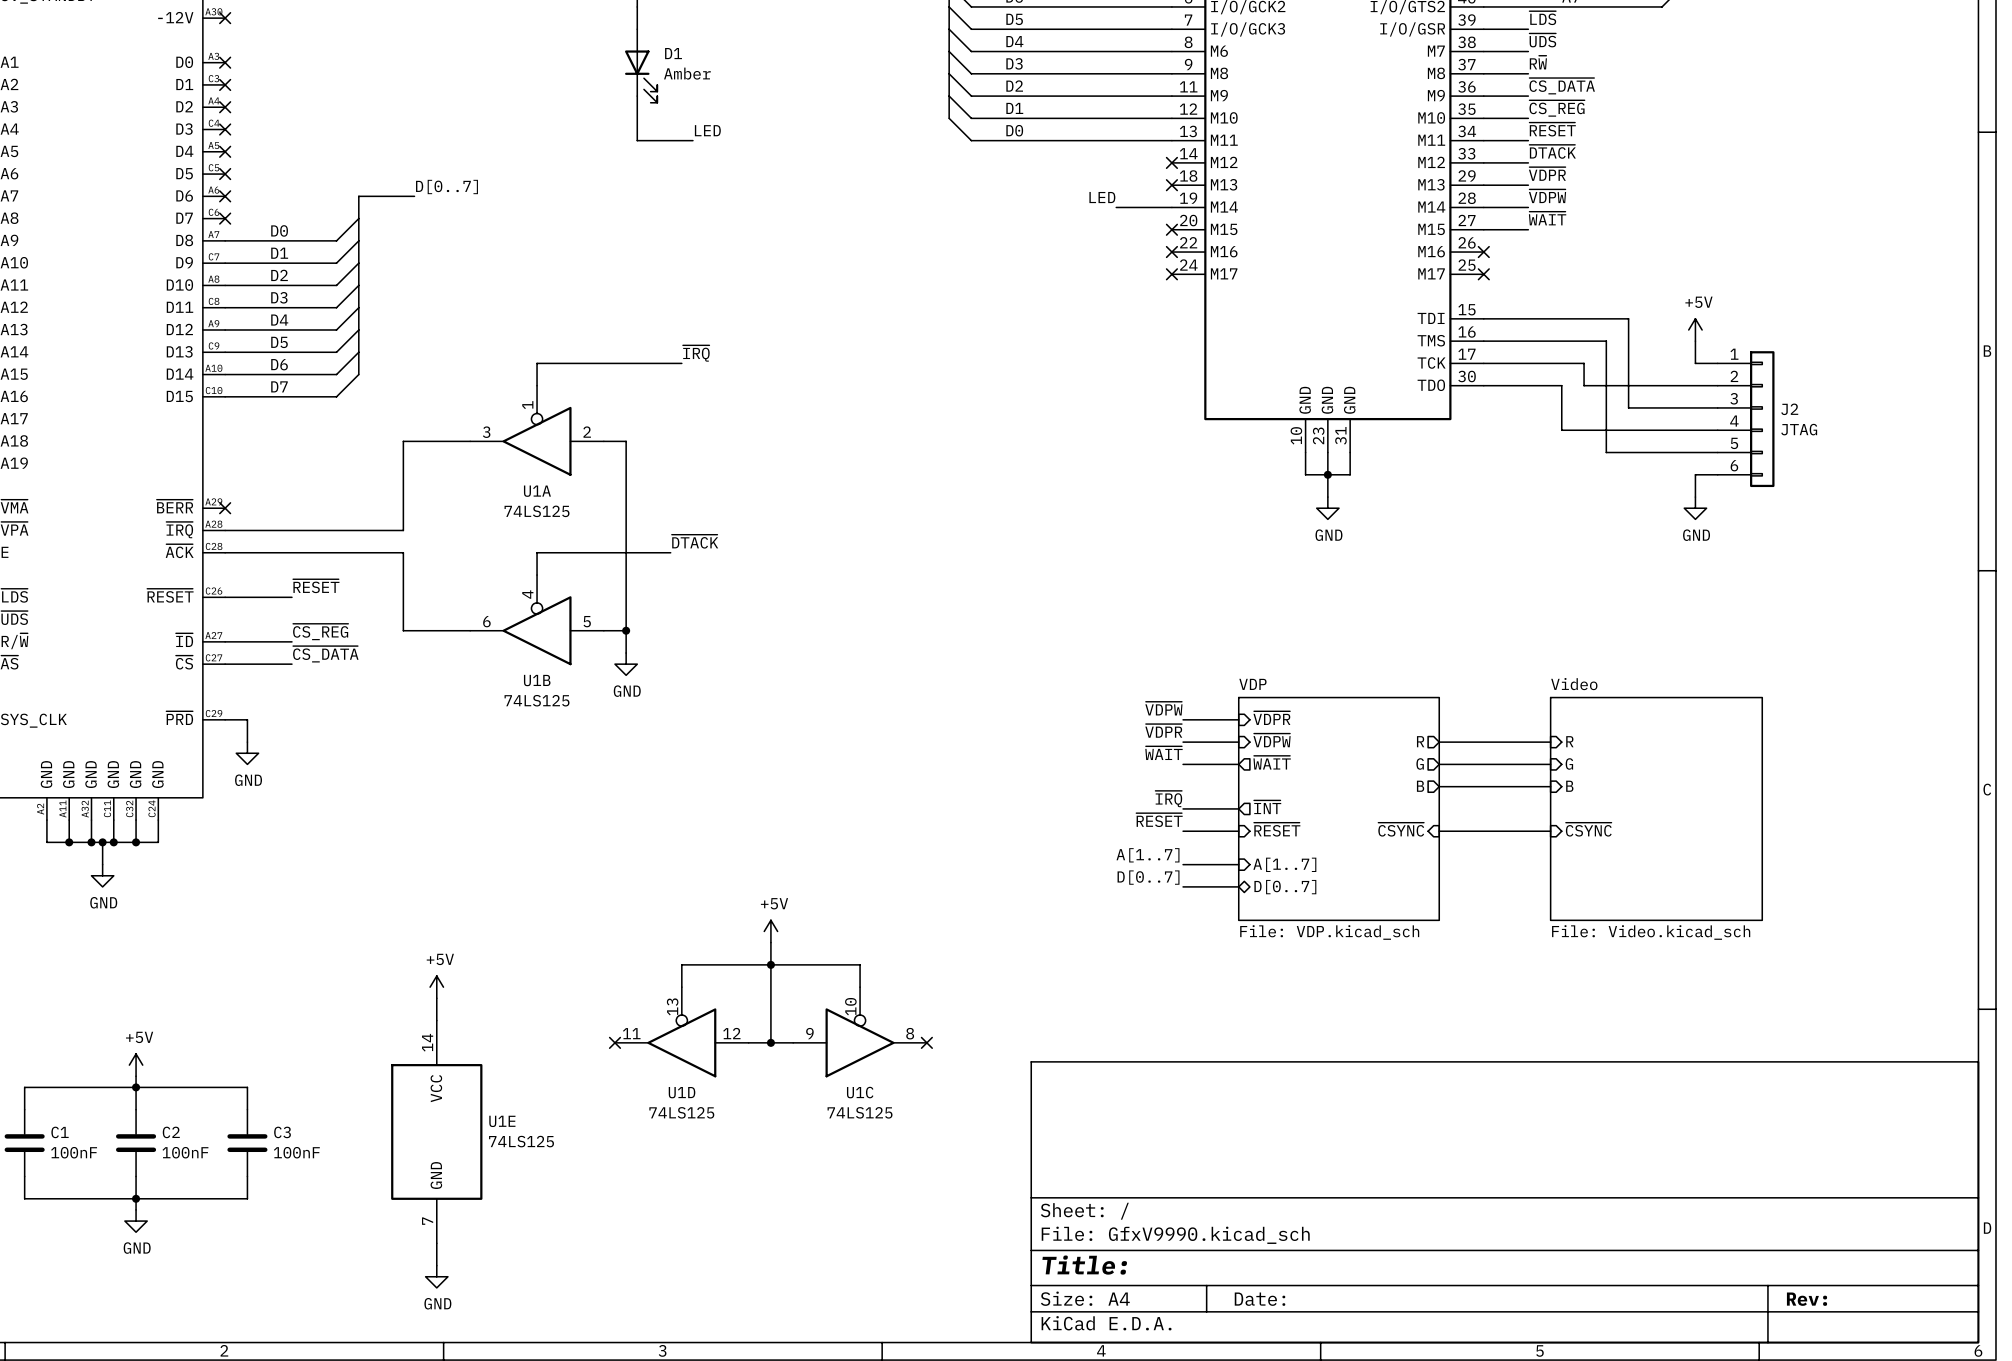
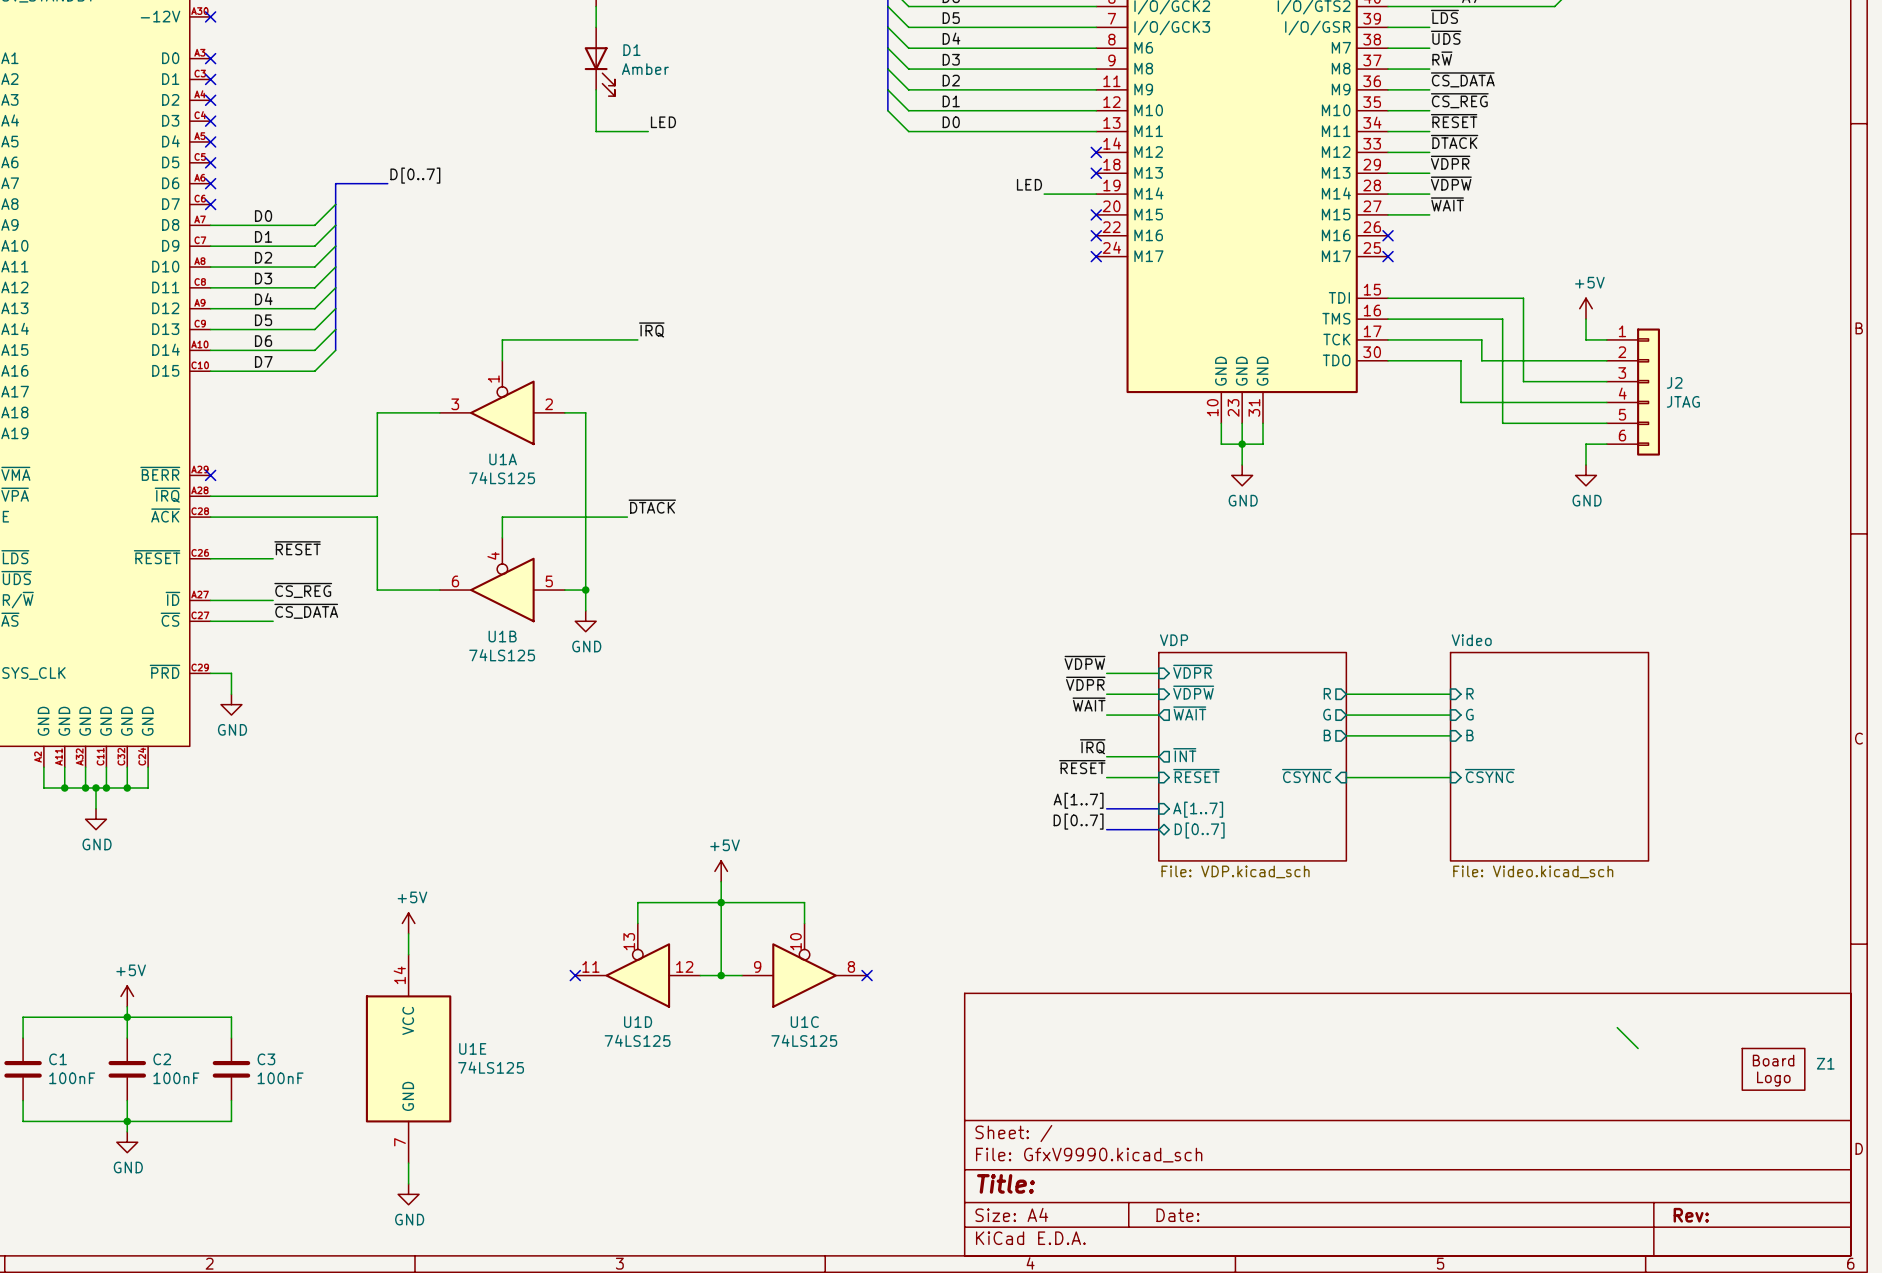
wire: none -> (1617, 1027) (1638, 1048)
Z1: none -> (1773, 1069)

